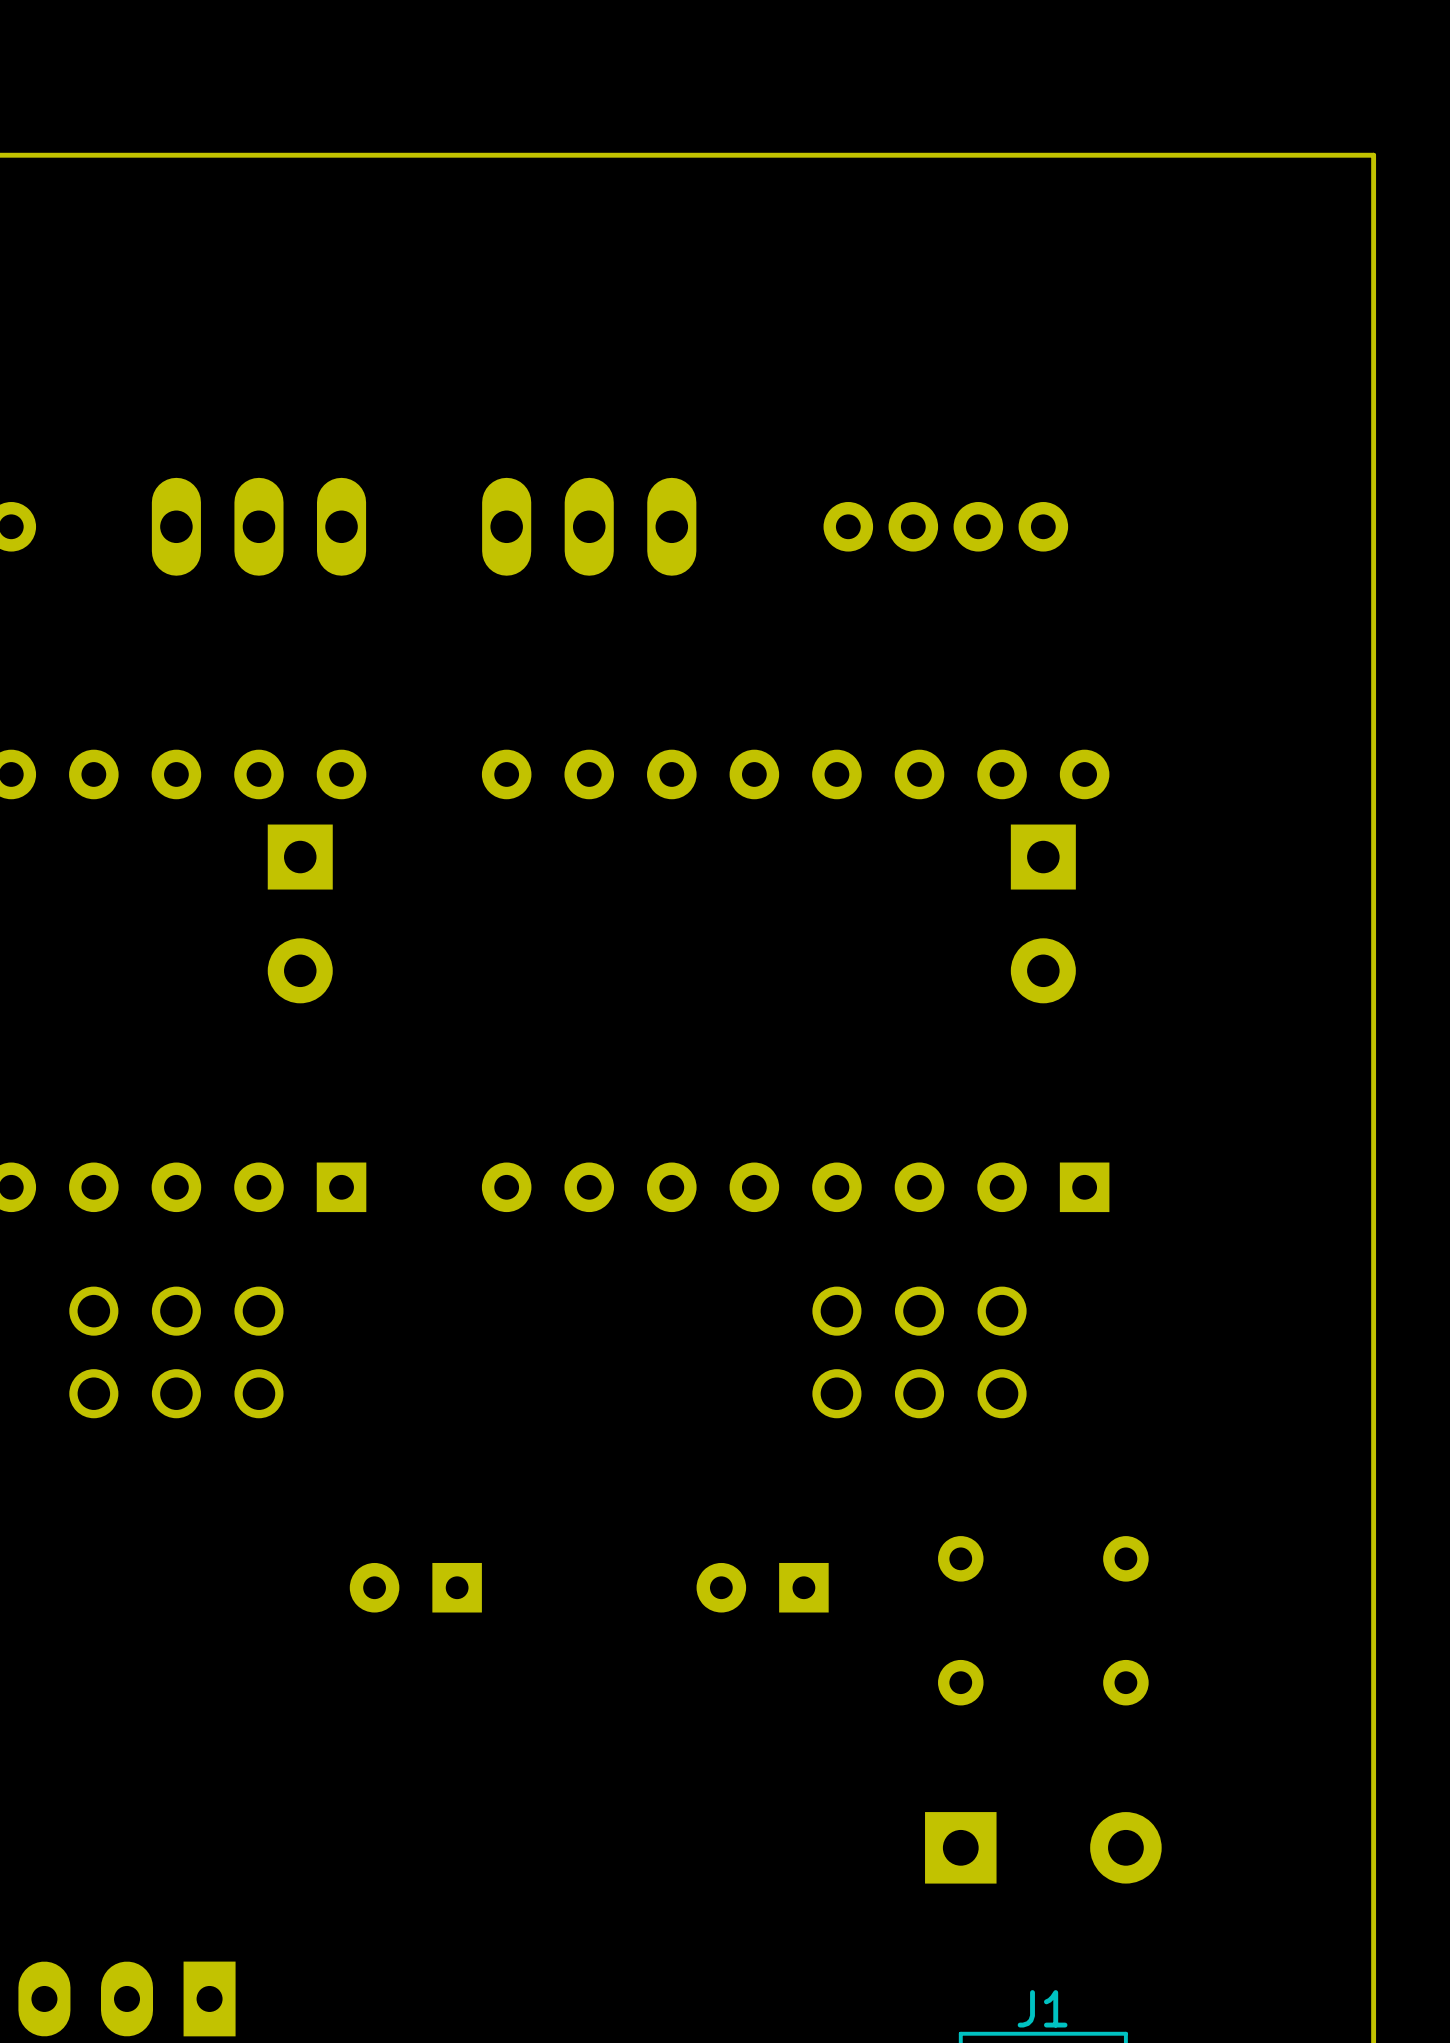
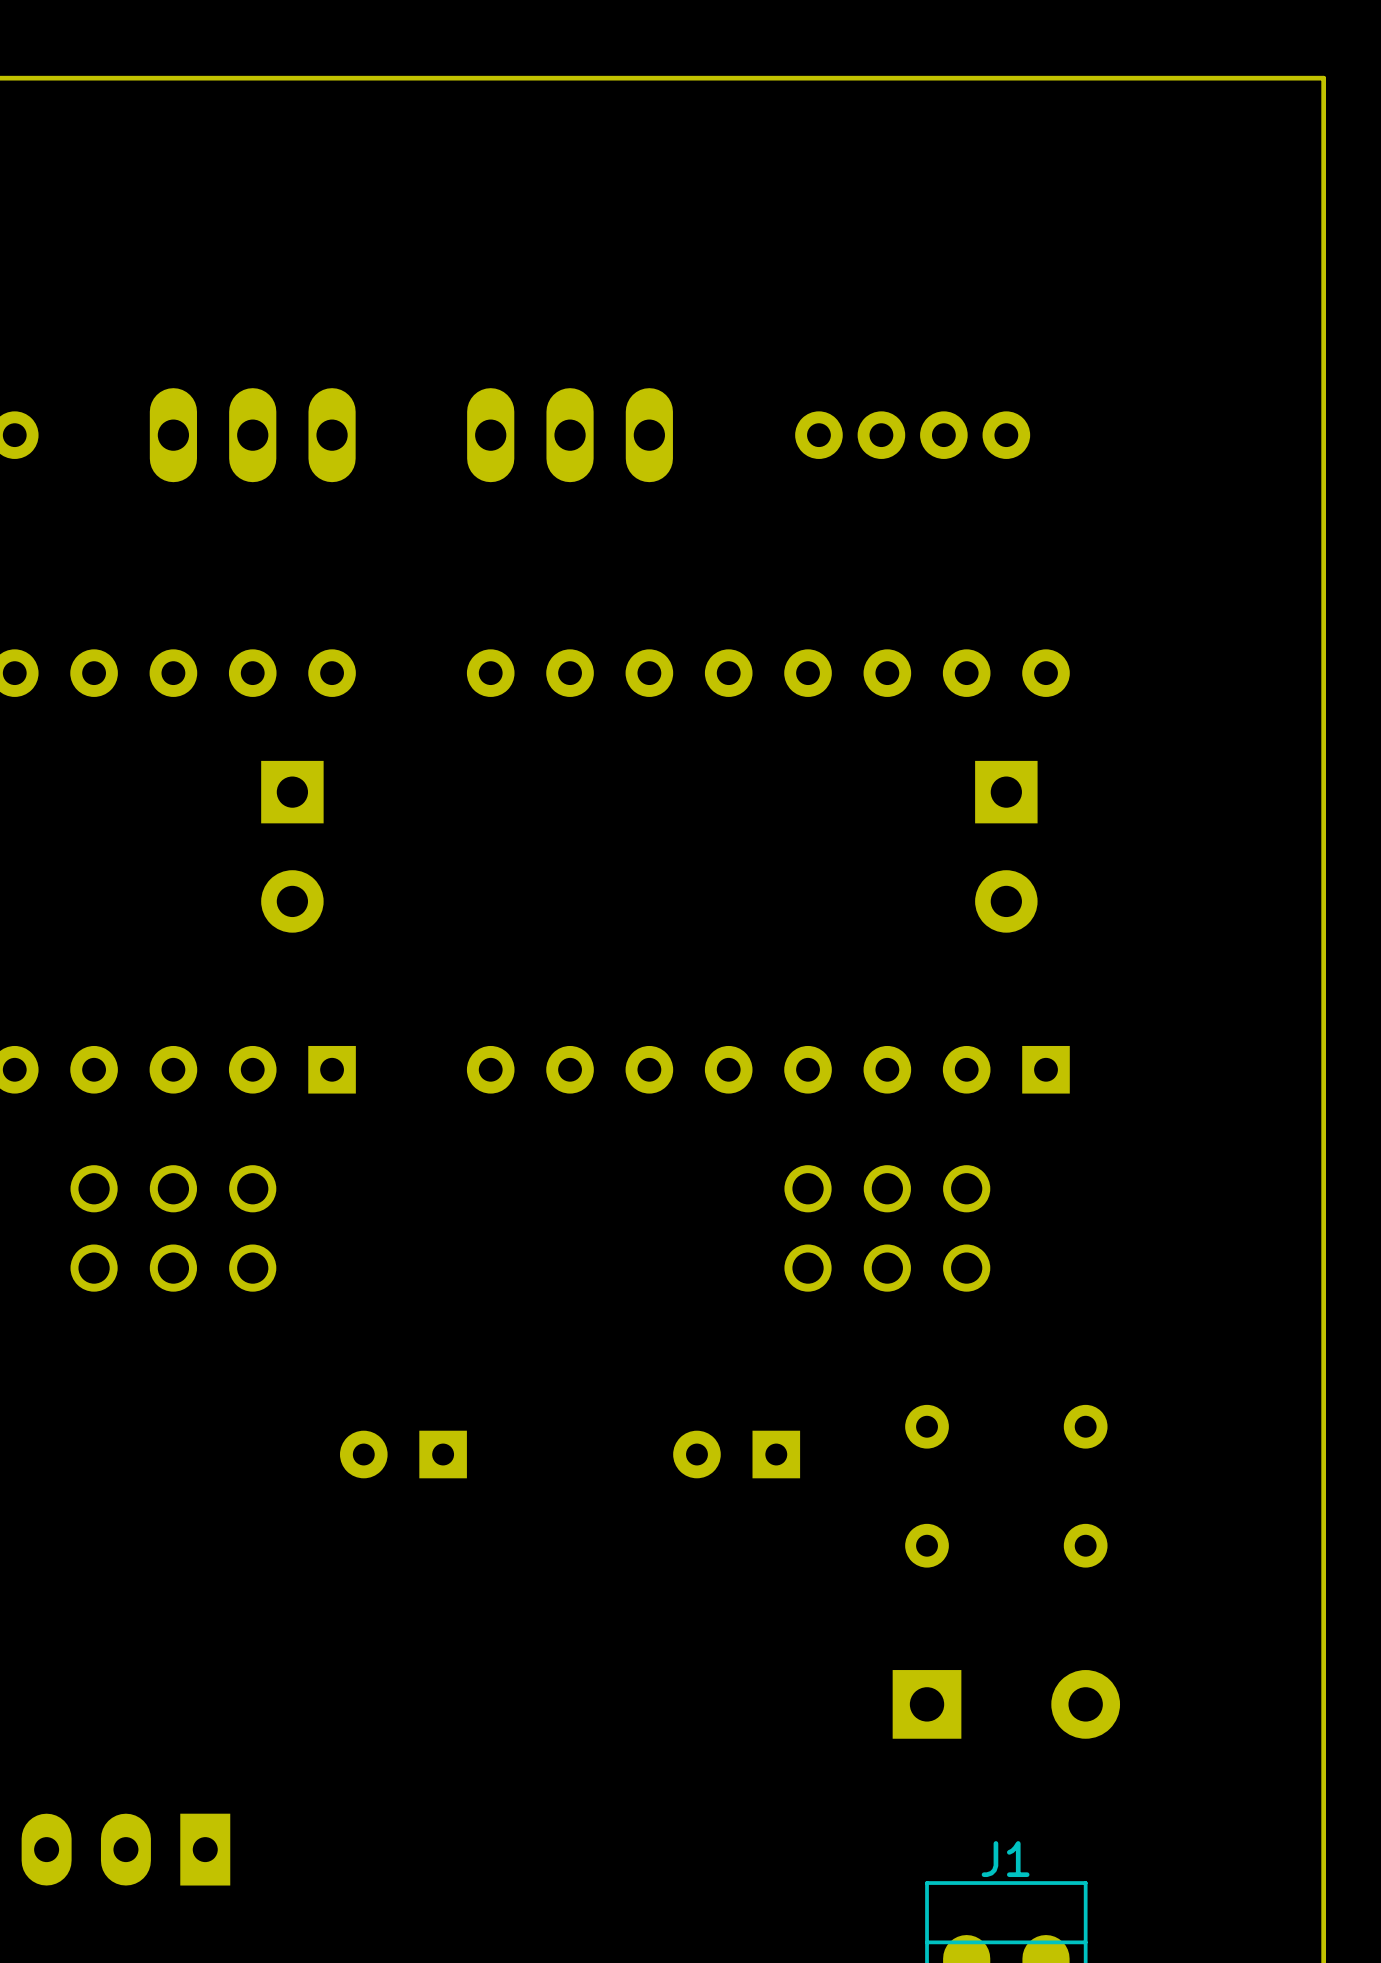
part position: (300, 913) -> (292, 846)
part position: (1043, 913) -> (1006, 846)

